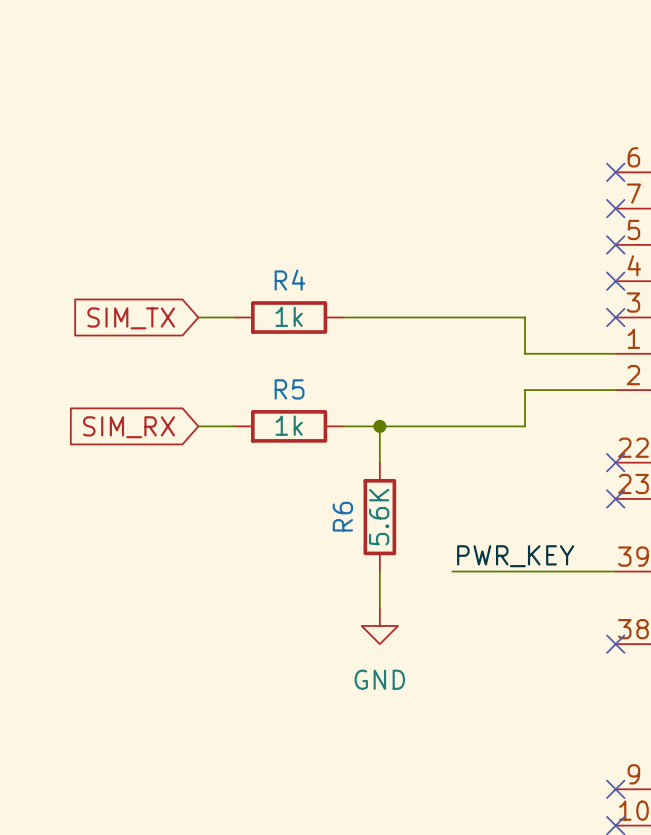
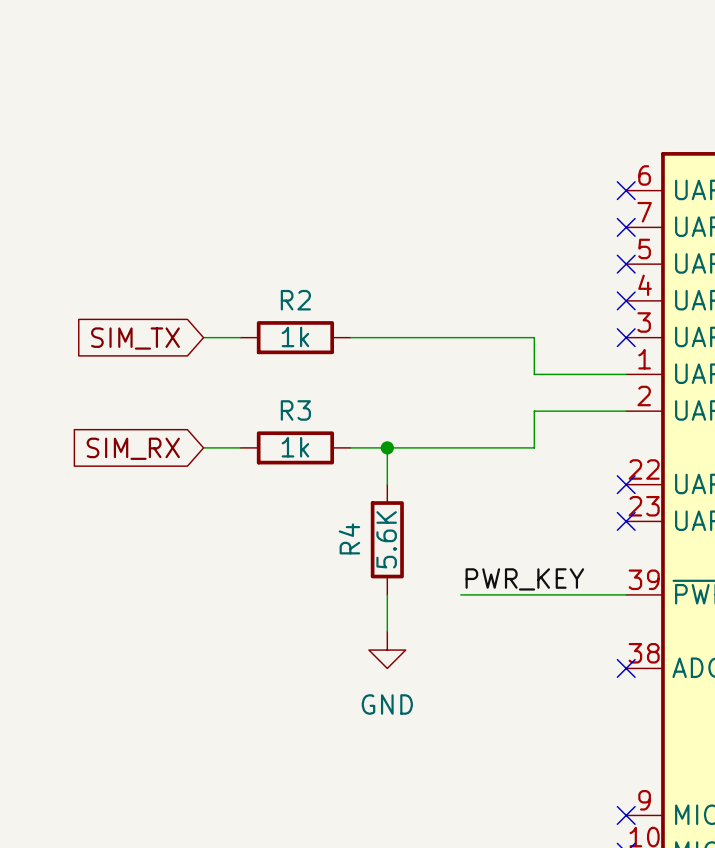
R4 name: R4 (289, 280) -> R2 (295, 300)
R5 name: R5 (289, 389) -> R3 (295, 410)
R6 name: R6 (342, 516) -> R4 (349, 538)

